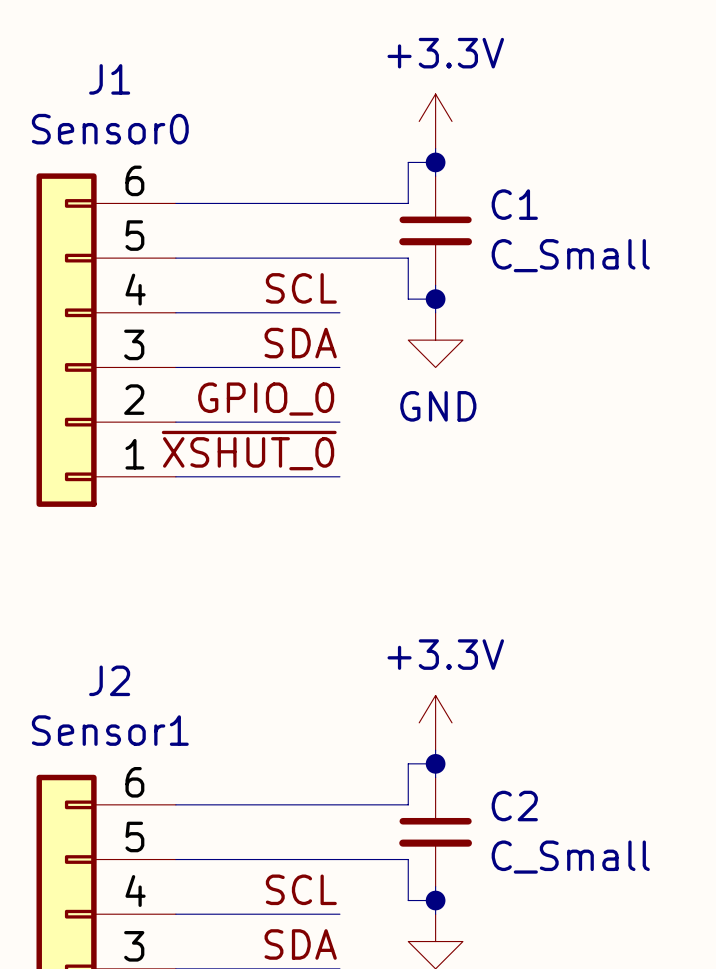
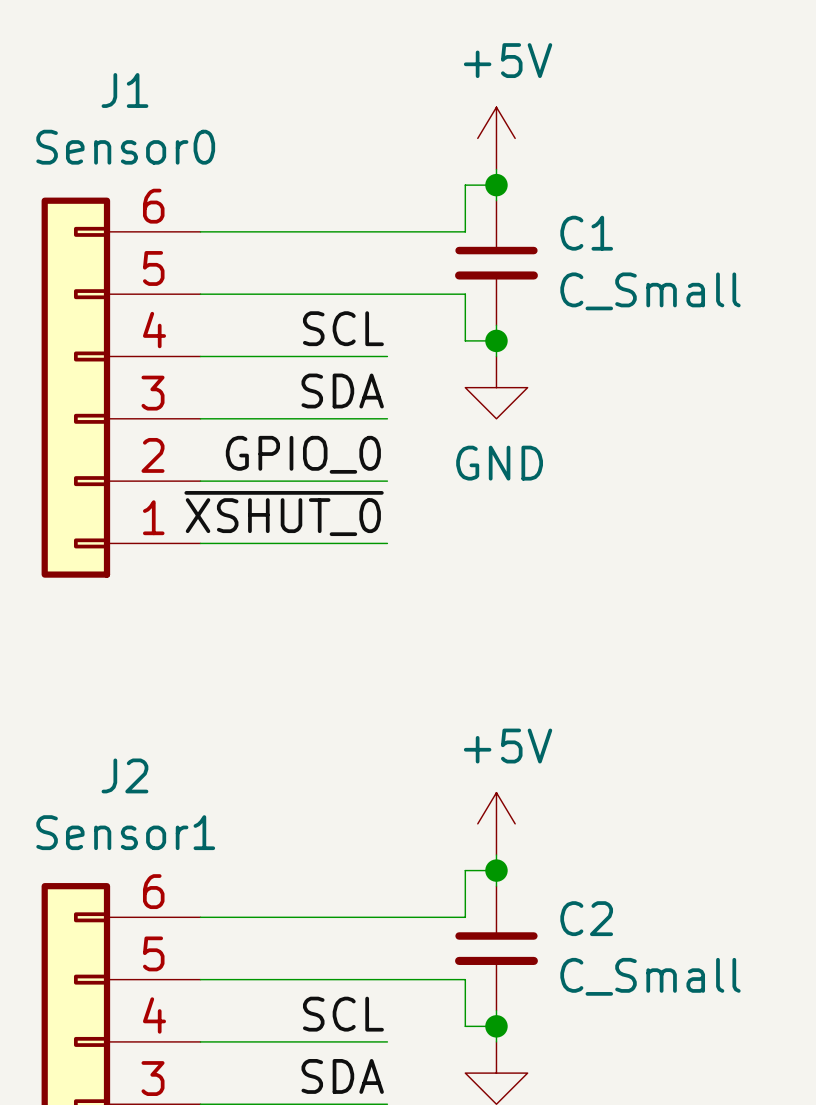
power symbol: +3.3V (435, 121) -> +5V (496, 138)
power symbol: +3.3V (435, 722) -> +5V (496, 823)

